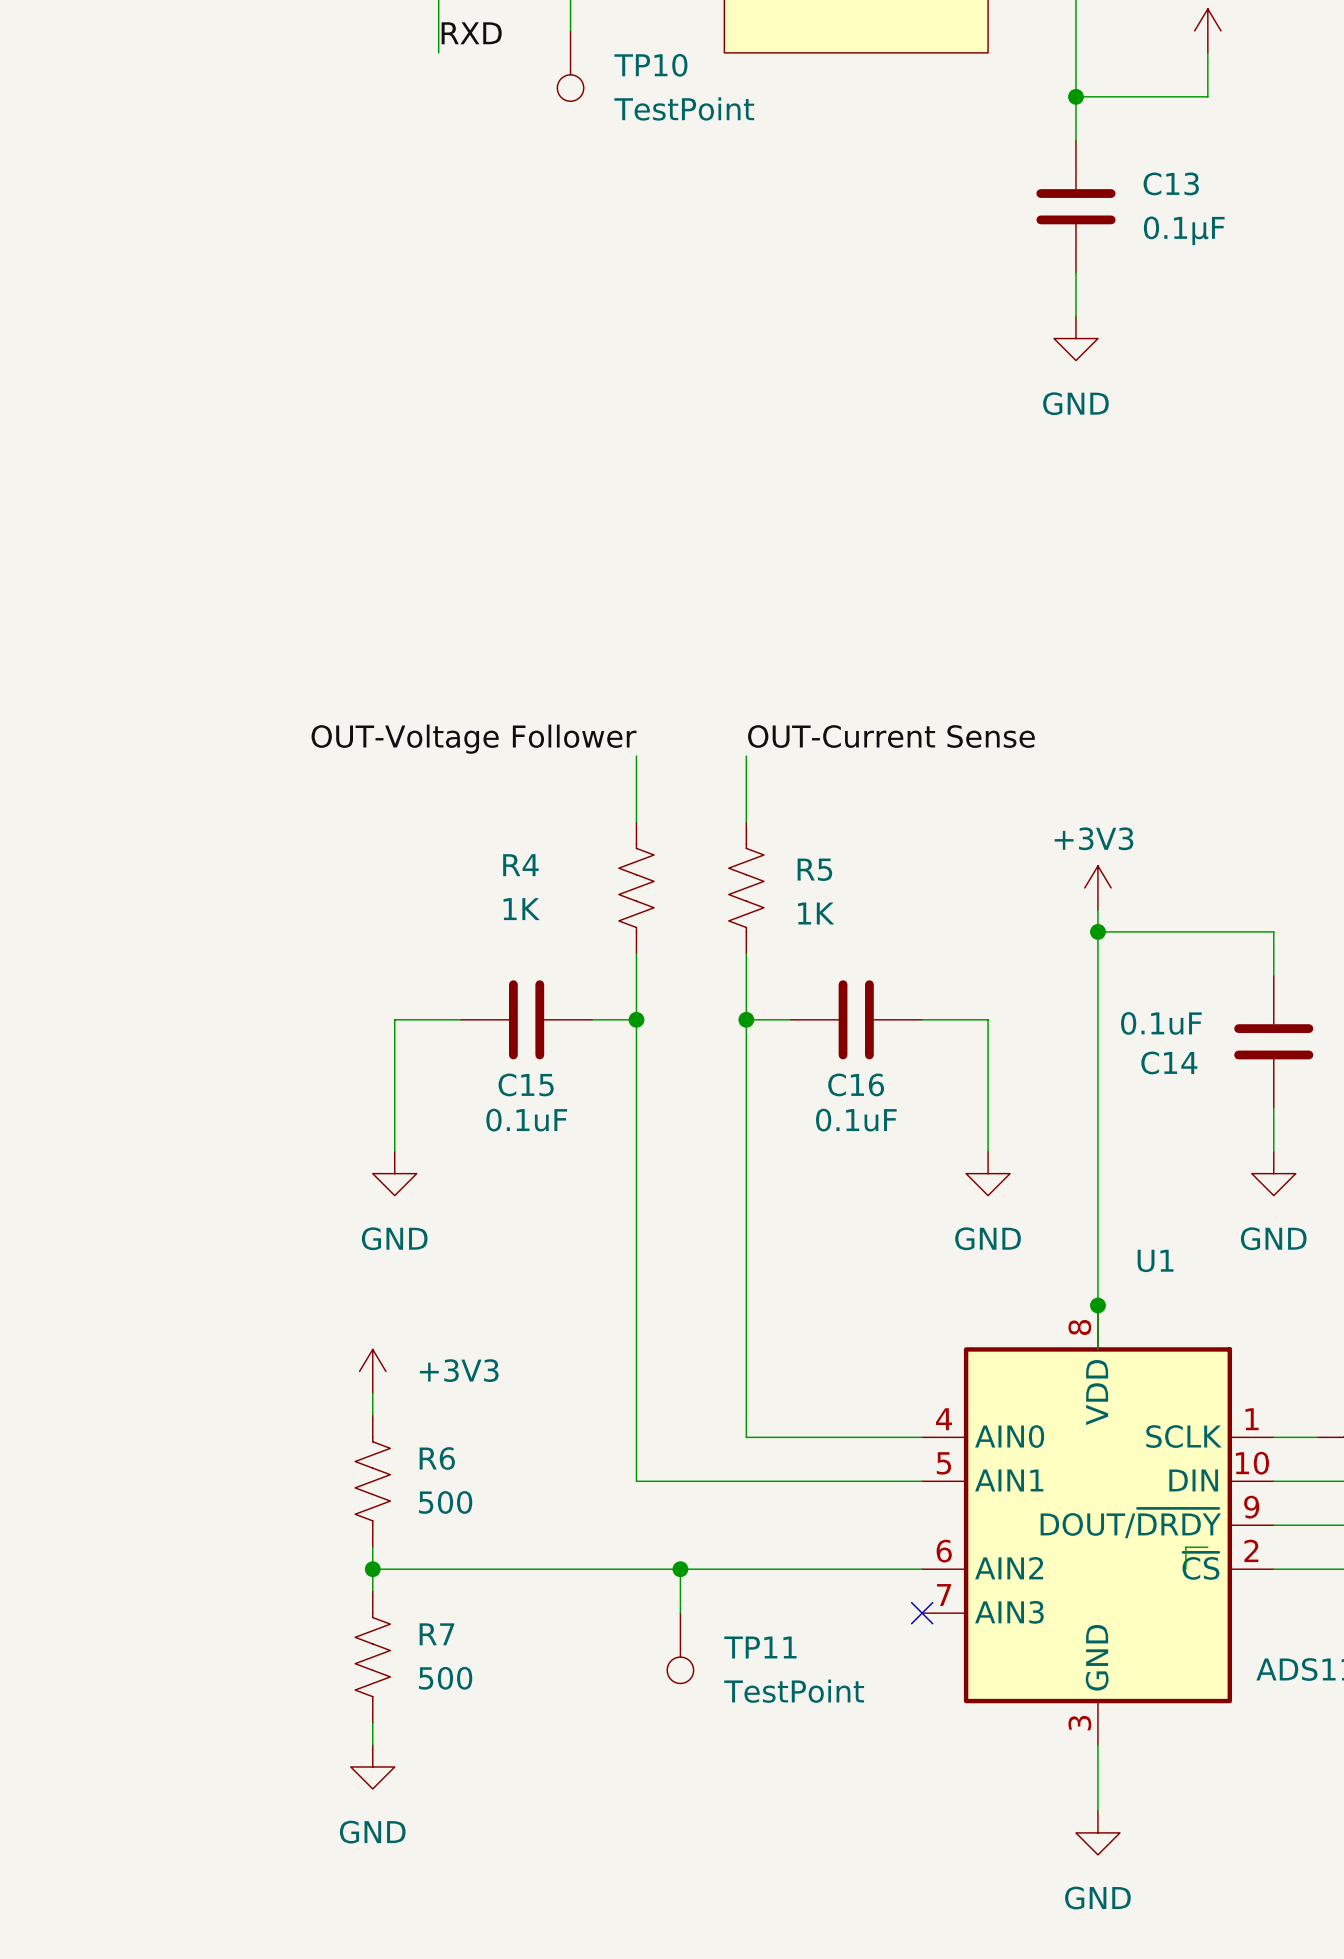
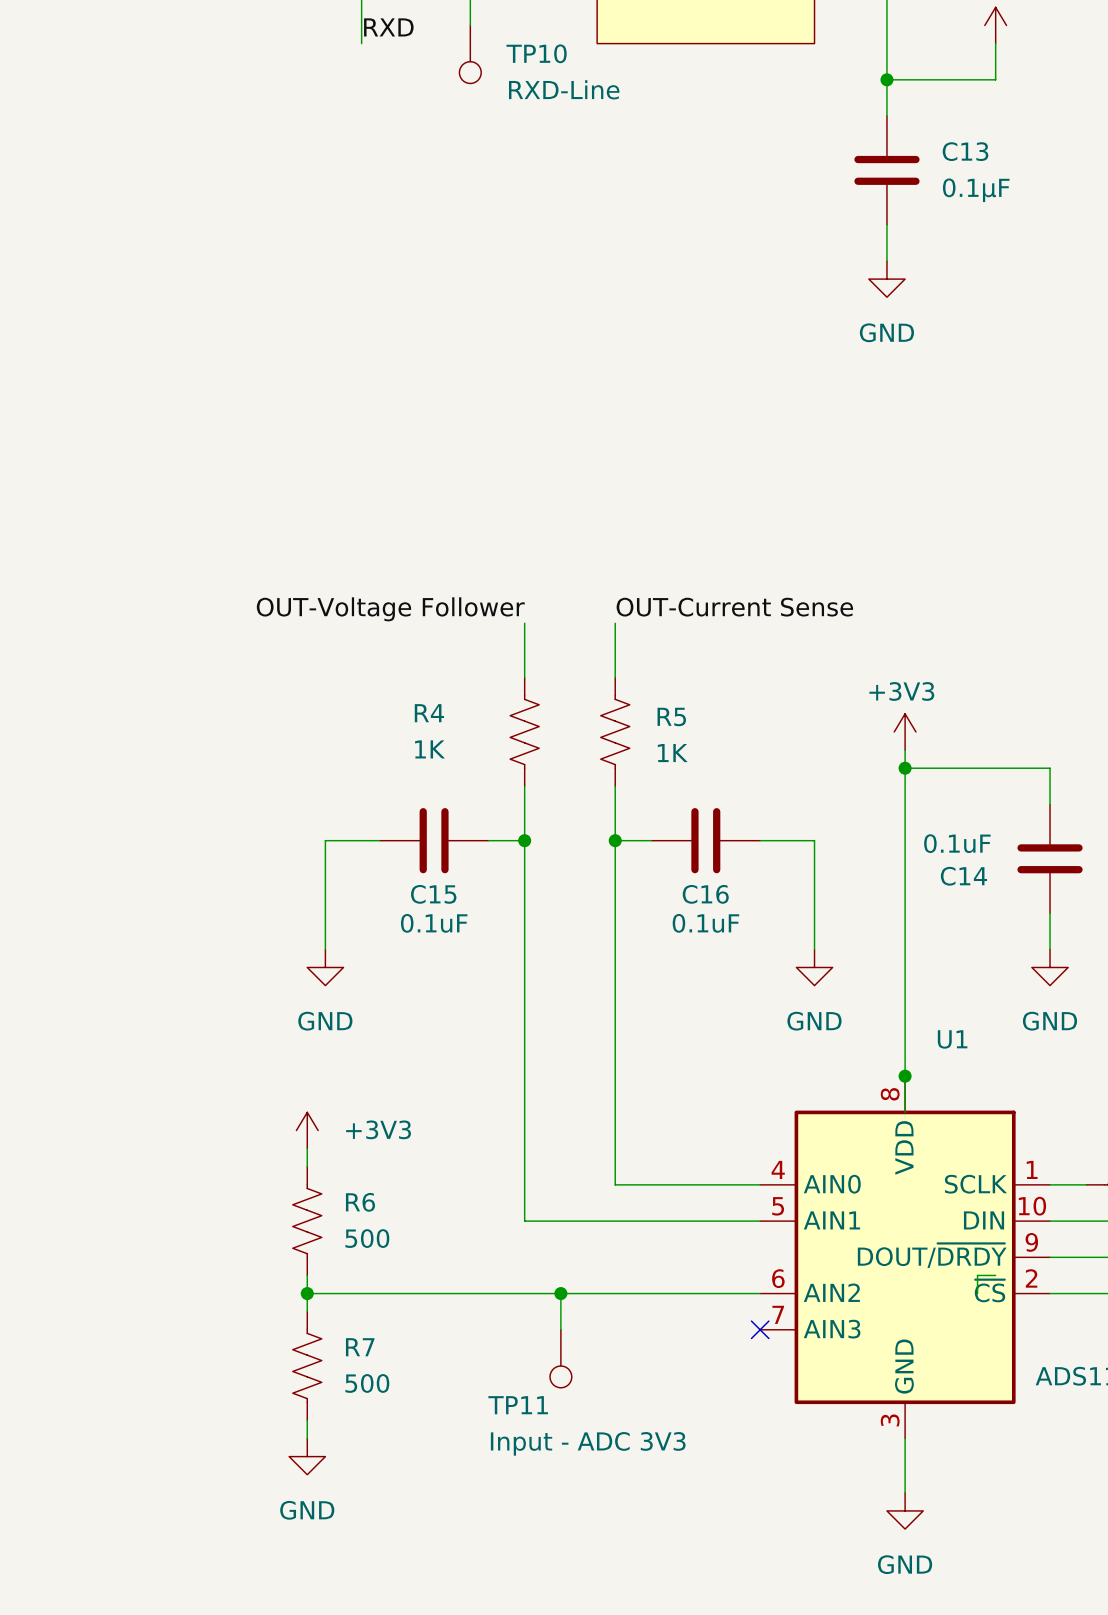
TP10 value: TestPoint (684, 108) -> RXD-Line (564, 89)
TP11 name position: TP11 (760, 1647) -> TP11 (518, 1405)
TP11 value: TestPoint (794, 1691) -> Input - ADC 3V3 (588, 1443)

